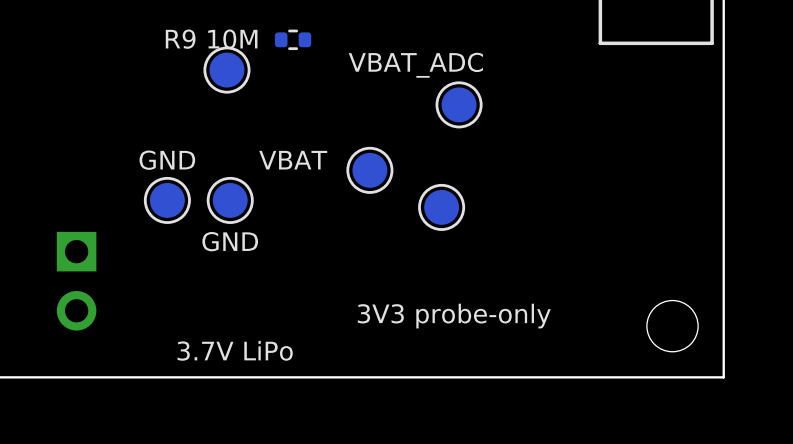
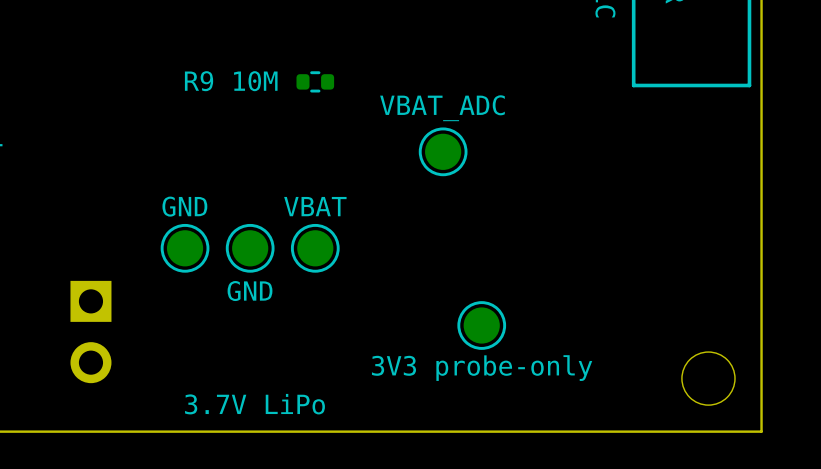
part: (226, 70) -> none
part: (459, 104) -> none
part: none -> (443, 151)
part: (369, 170) -> none
part: none -> (315, 248)
part: (441, 207) -> none
part: none -> (481, 325)

